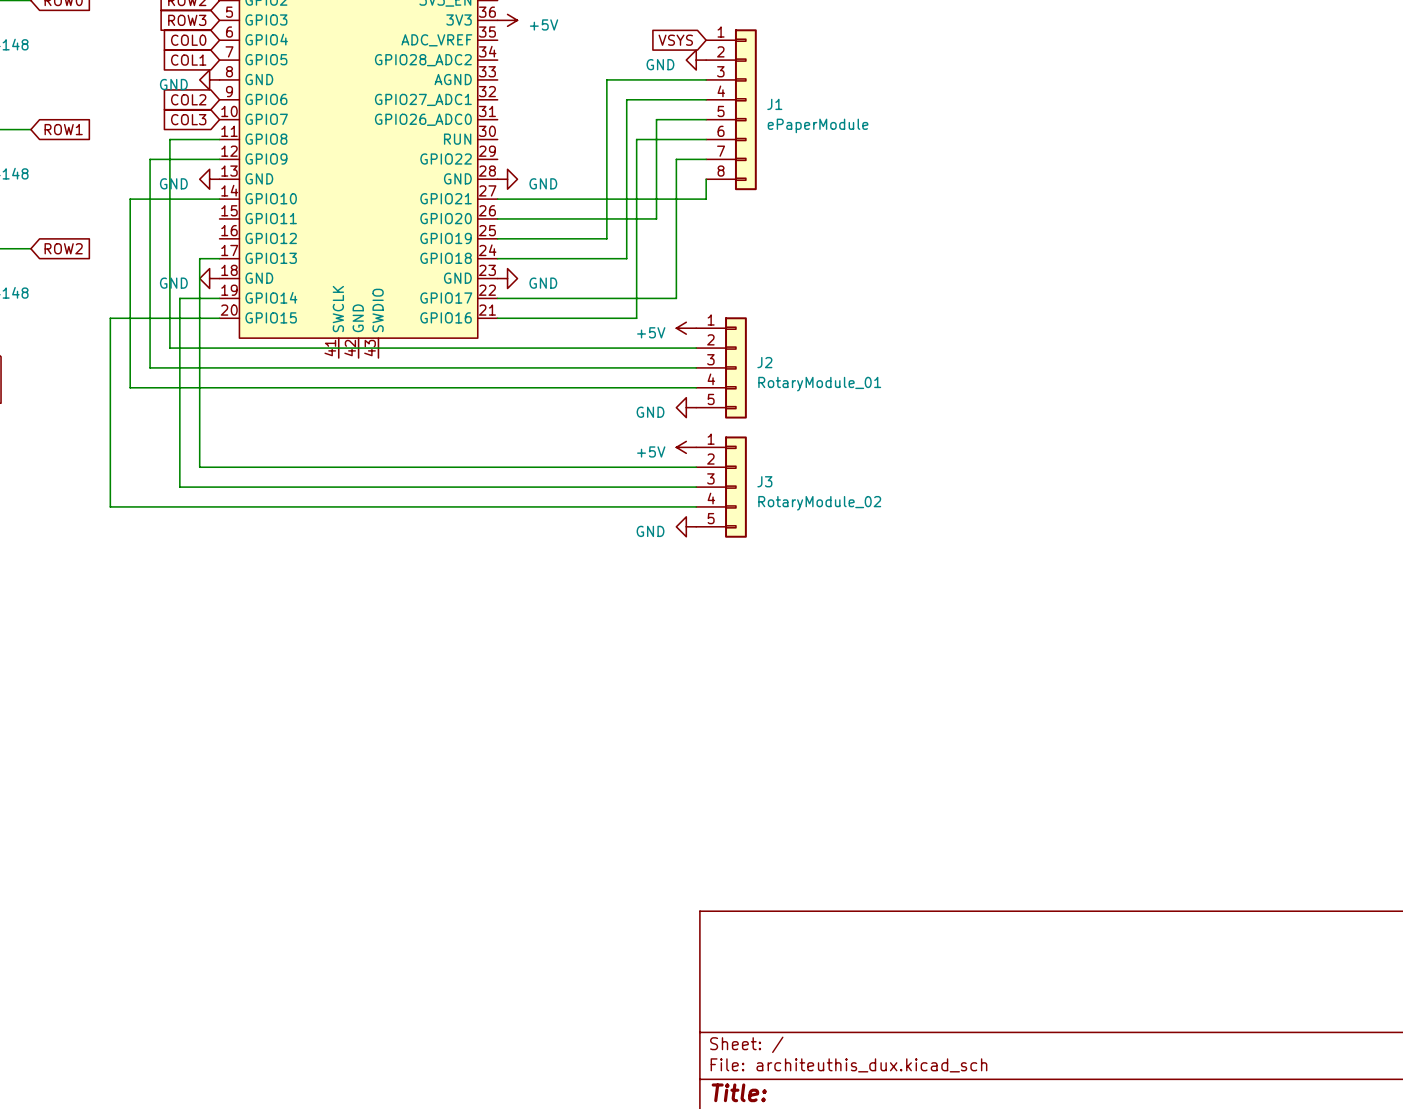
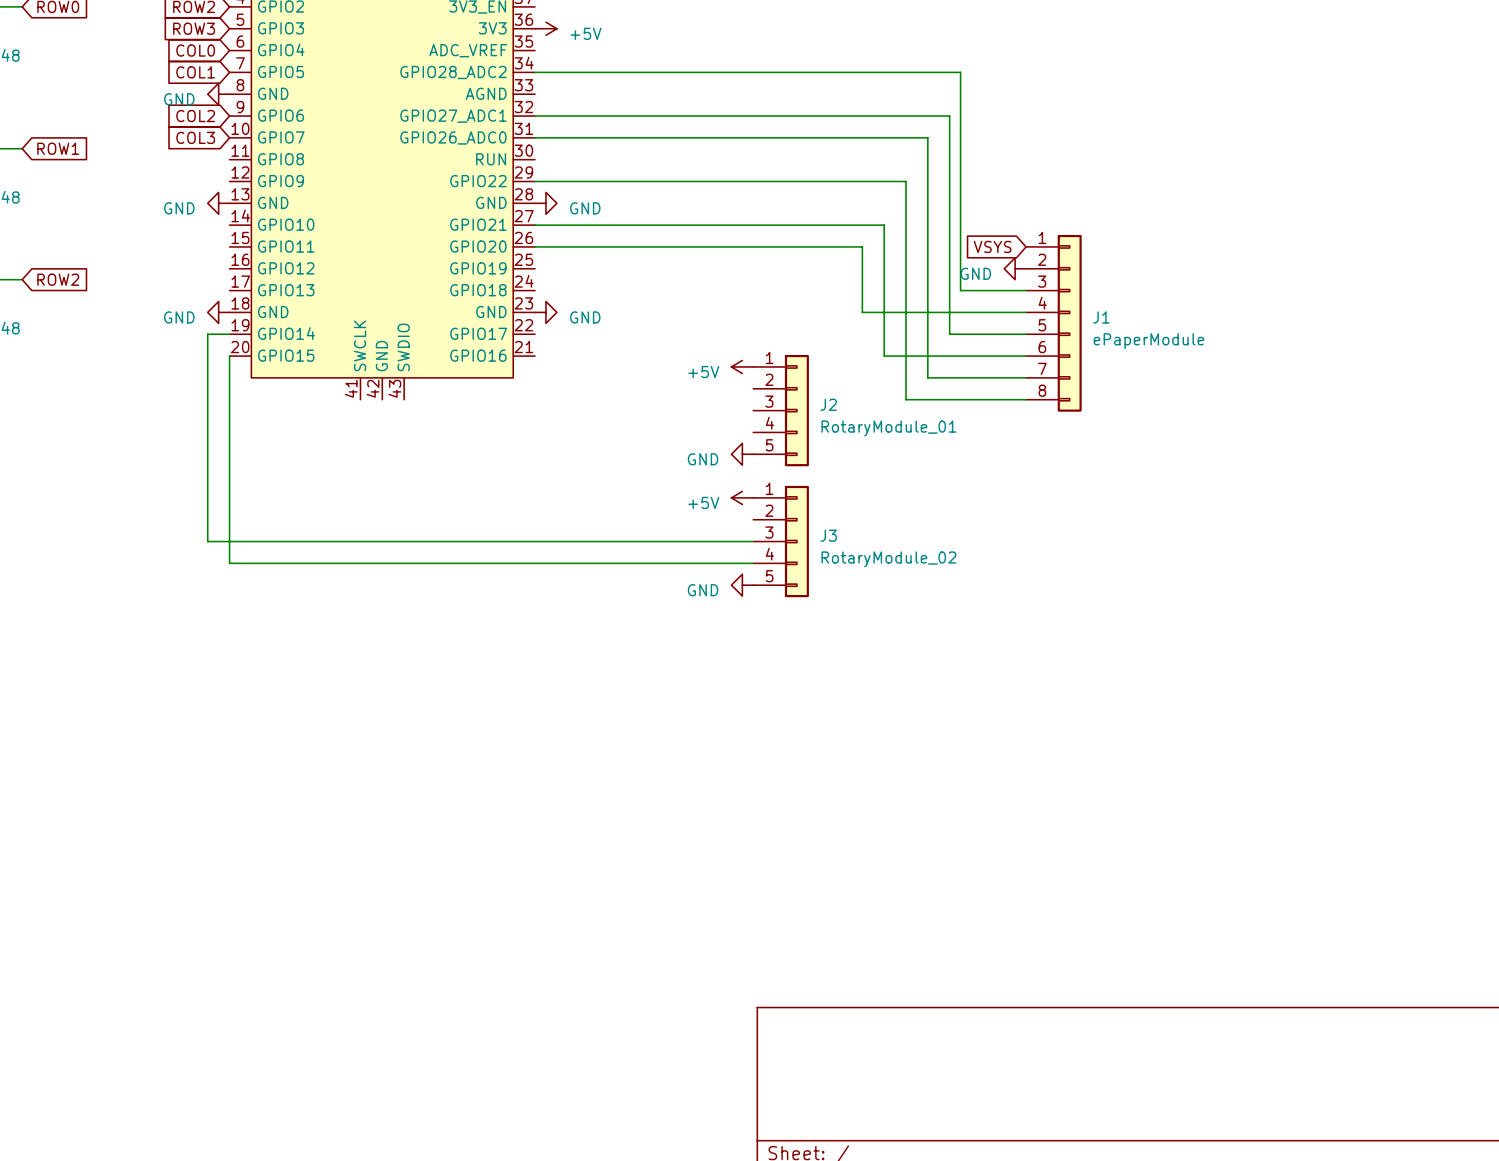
global label: VSYS (675, 40) -> none
wire: none -> (535, 72) (960, 72) (960, 290) (1026, 290)
power symbol: GND (696, 60) -> none
wire: (706, 79) (606, 79) (606, 238) (497, 238) -> none
wire: (626, 99) (626, 258) (497, 258) -> (676, 116) (535, 116)
wire: none -> (764, 116) (949, 116) (949, 334) (1026, 334)
J1 position: (731, 109) -> (1053, 323)
wire: (656, 119) (656, 218) -> (709, 137) (535, 137)
wire: none -> (764, 137) (927, 137) (927, 377) (1026, 377)
wire: (219, 139) (169, 139) (169, 348) (696, 348) -> none
wire: (706, 139) (636, 139) (636, 318) (497, 318) -> none
wire: (219, 159) (150, 159) (150, 367) (696, 367) -> none
wire: (676, 159) (676, 298) (497, 298) -> (731, 181) (535, 181)
wire: none -> (764, 181) (906, 181) (906, 399) (1026, 399)
wire: (706, 179) (706, 199) -> (1026, 356) (884, 356) (884, 225) (764, 225)
wire: (219, 199) (130, 199) (130, 387) (696, 387) -> none
wire: none -> (709, 246) (862, 246) (862, 312) (1026, 312)
global label: none -> VSYS (992, 246)
power symbol: none -> GND (1015, 268)
wire: (219, 258) (199, 258) (199, 298) (179, 298) (179, 487) (199, 487) -> (207, 519) (207, 541)
wire: (219, 318) (110, 318) (110, 506) (219, 506) -> (229, 356) (229, 563)
wire: (199, 467) (696, 467) -> none

